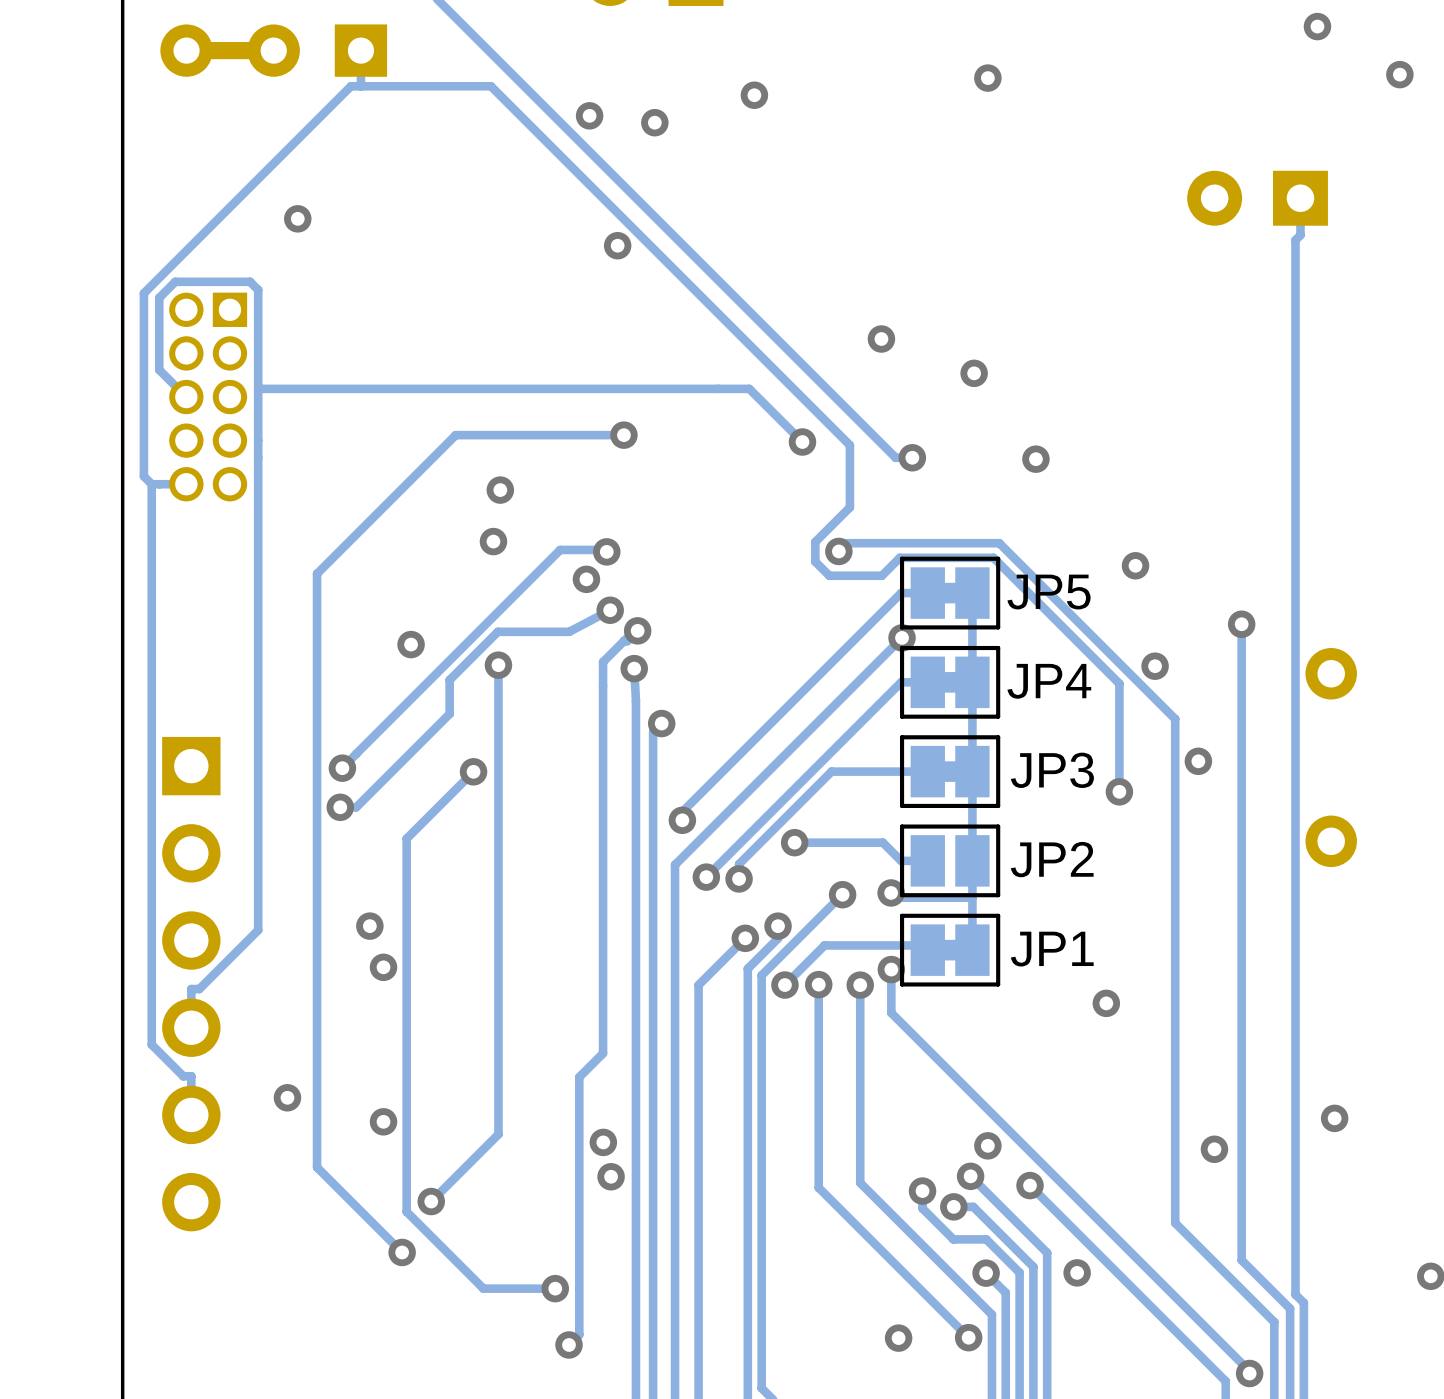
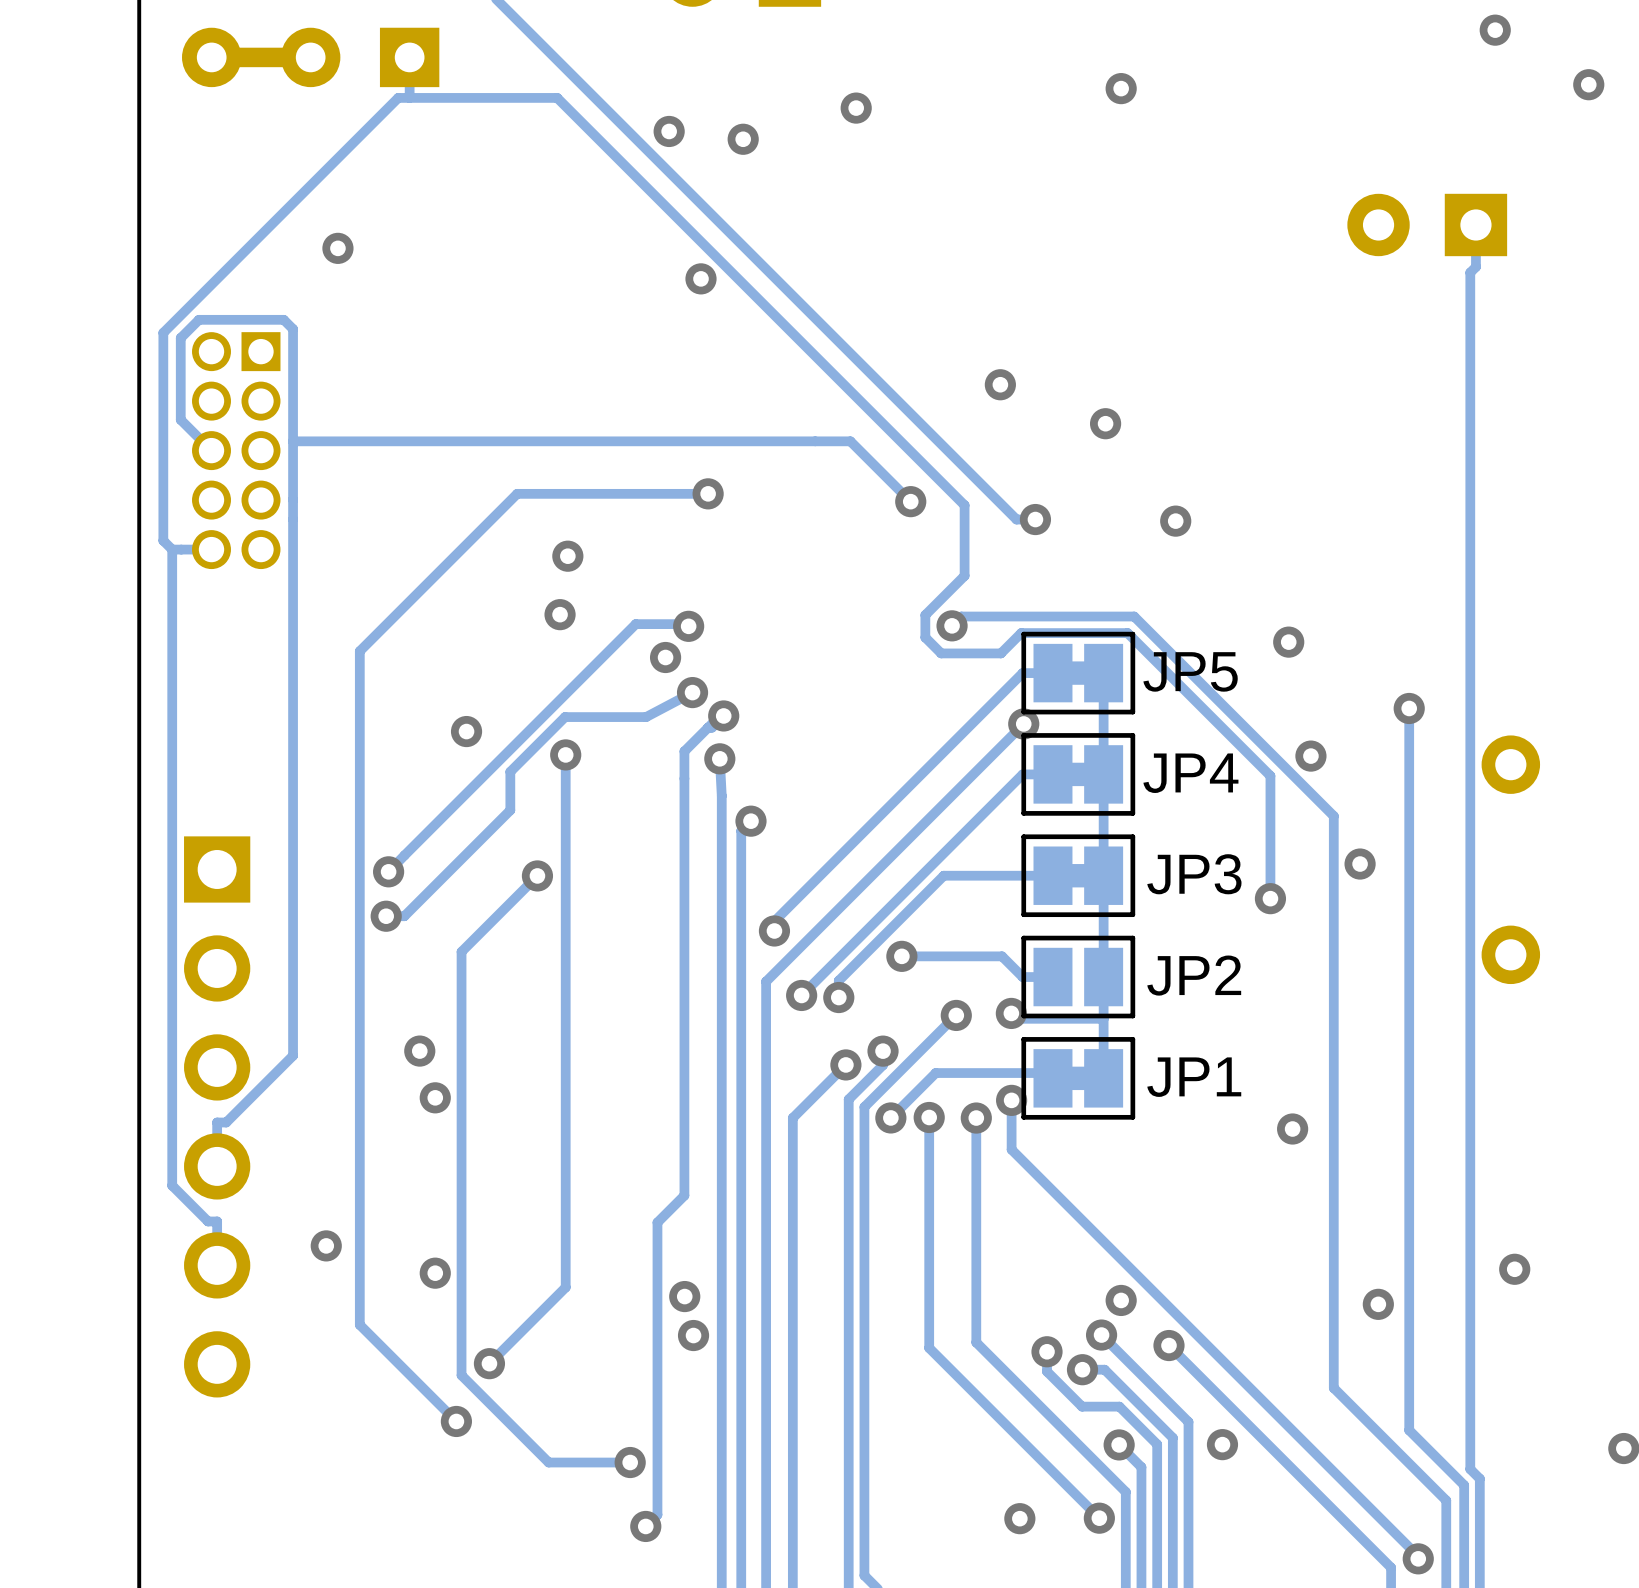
via position: (1106, 1003) -> (1292, 1129)

